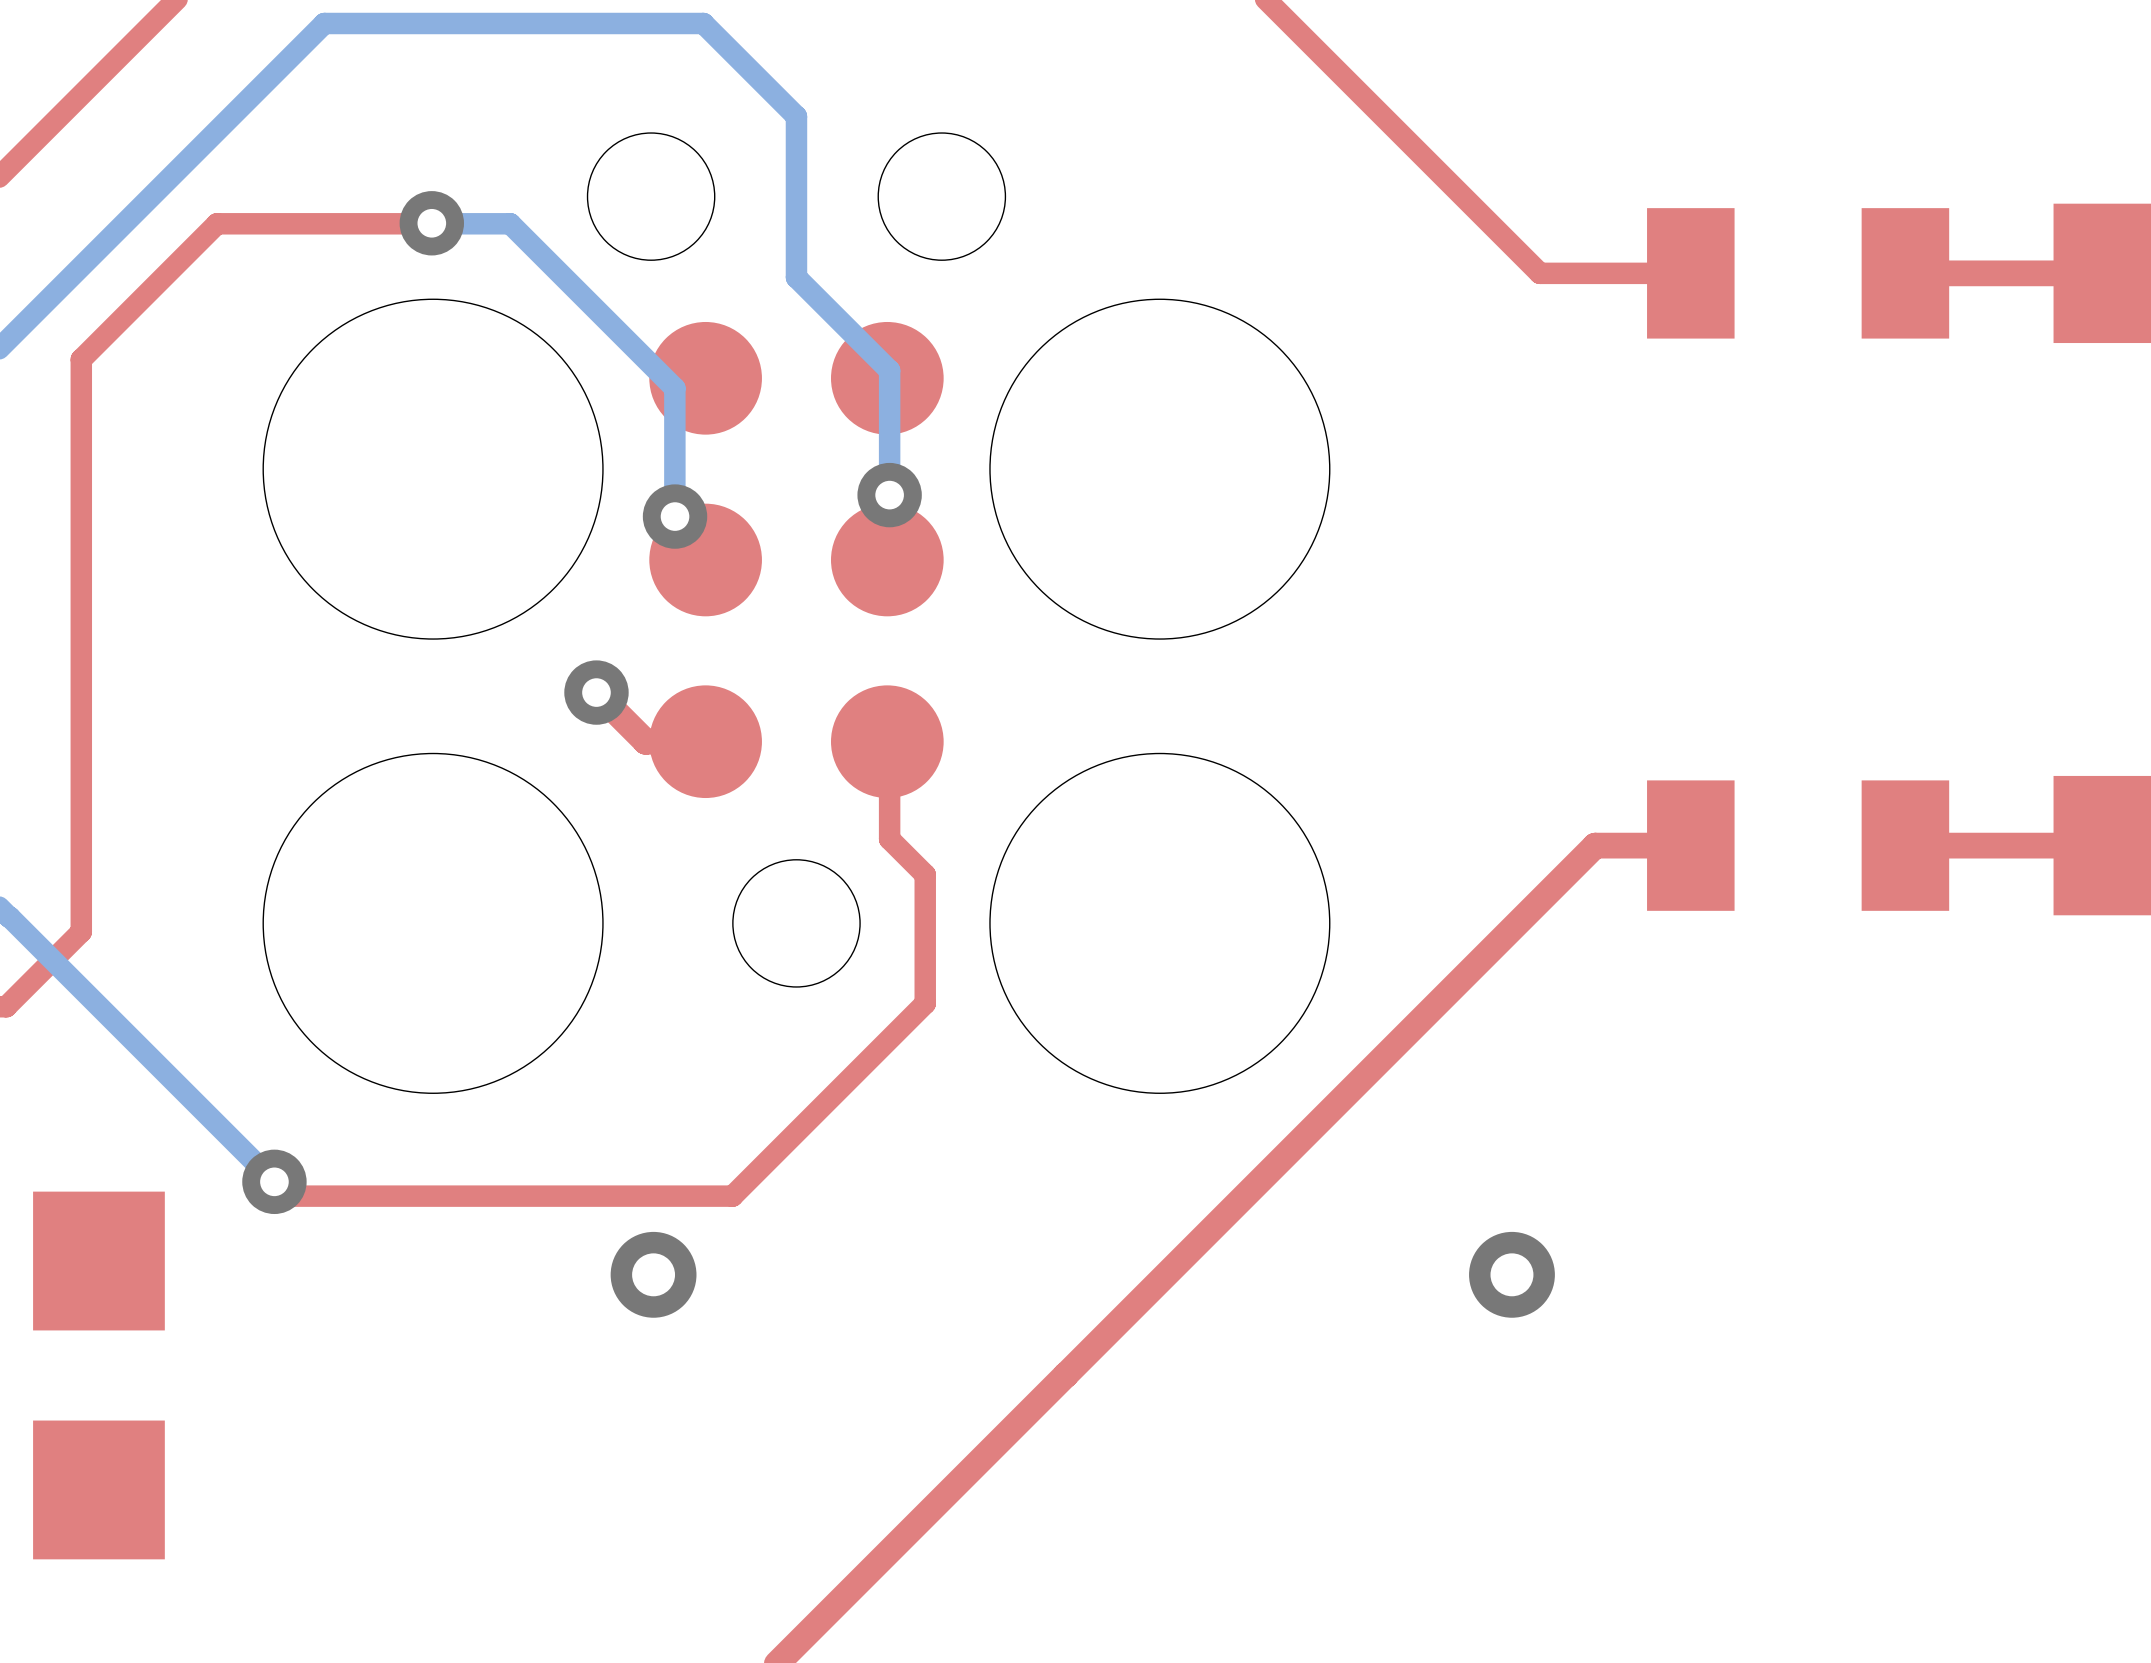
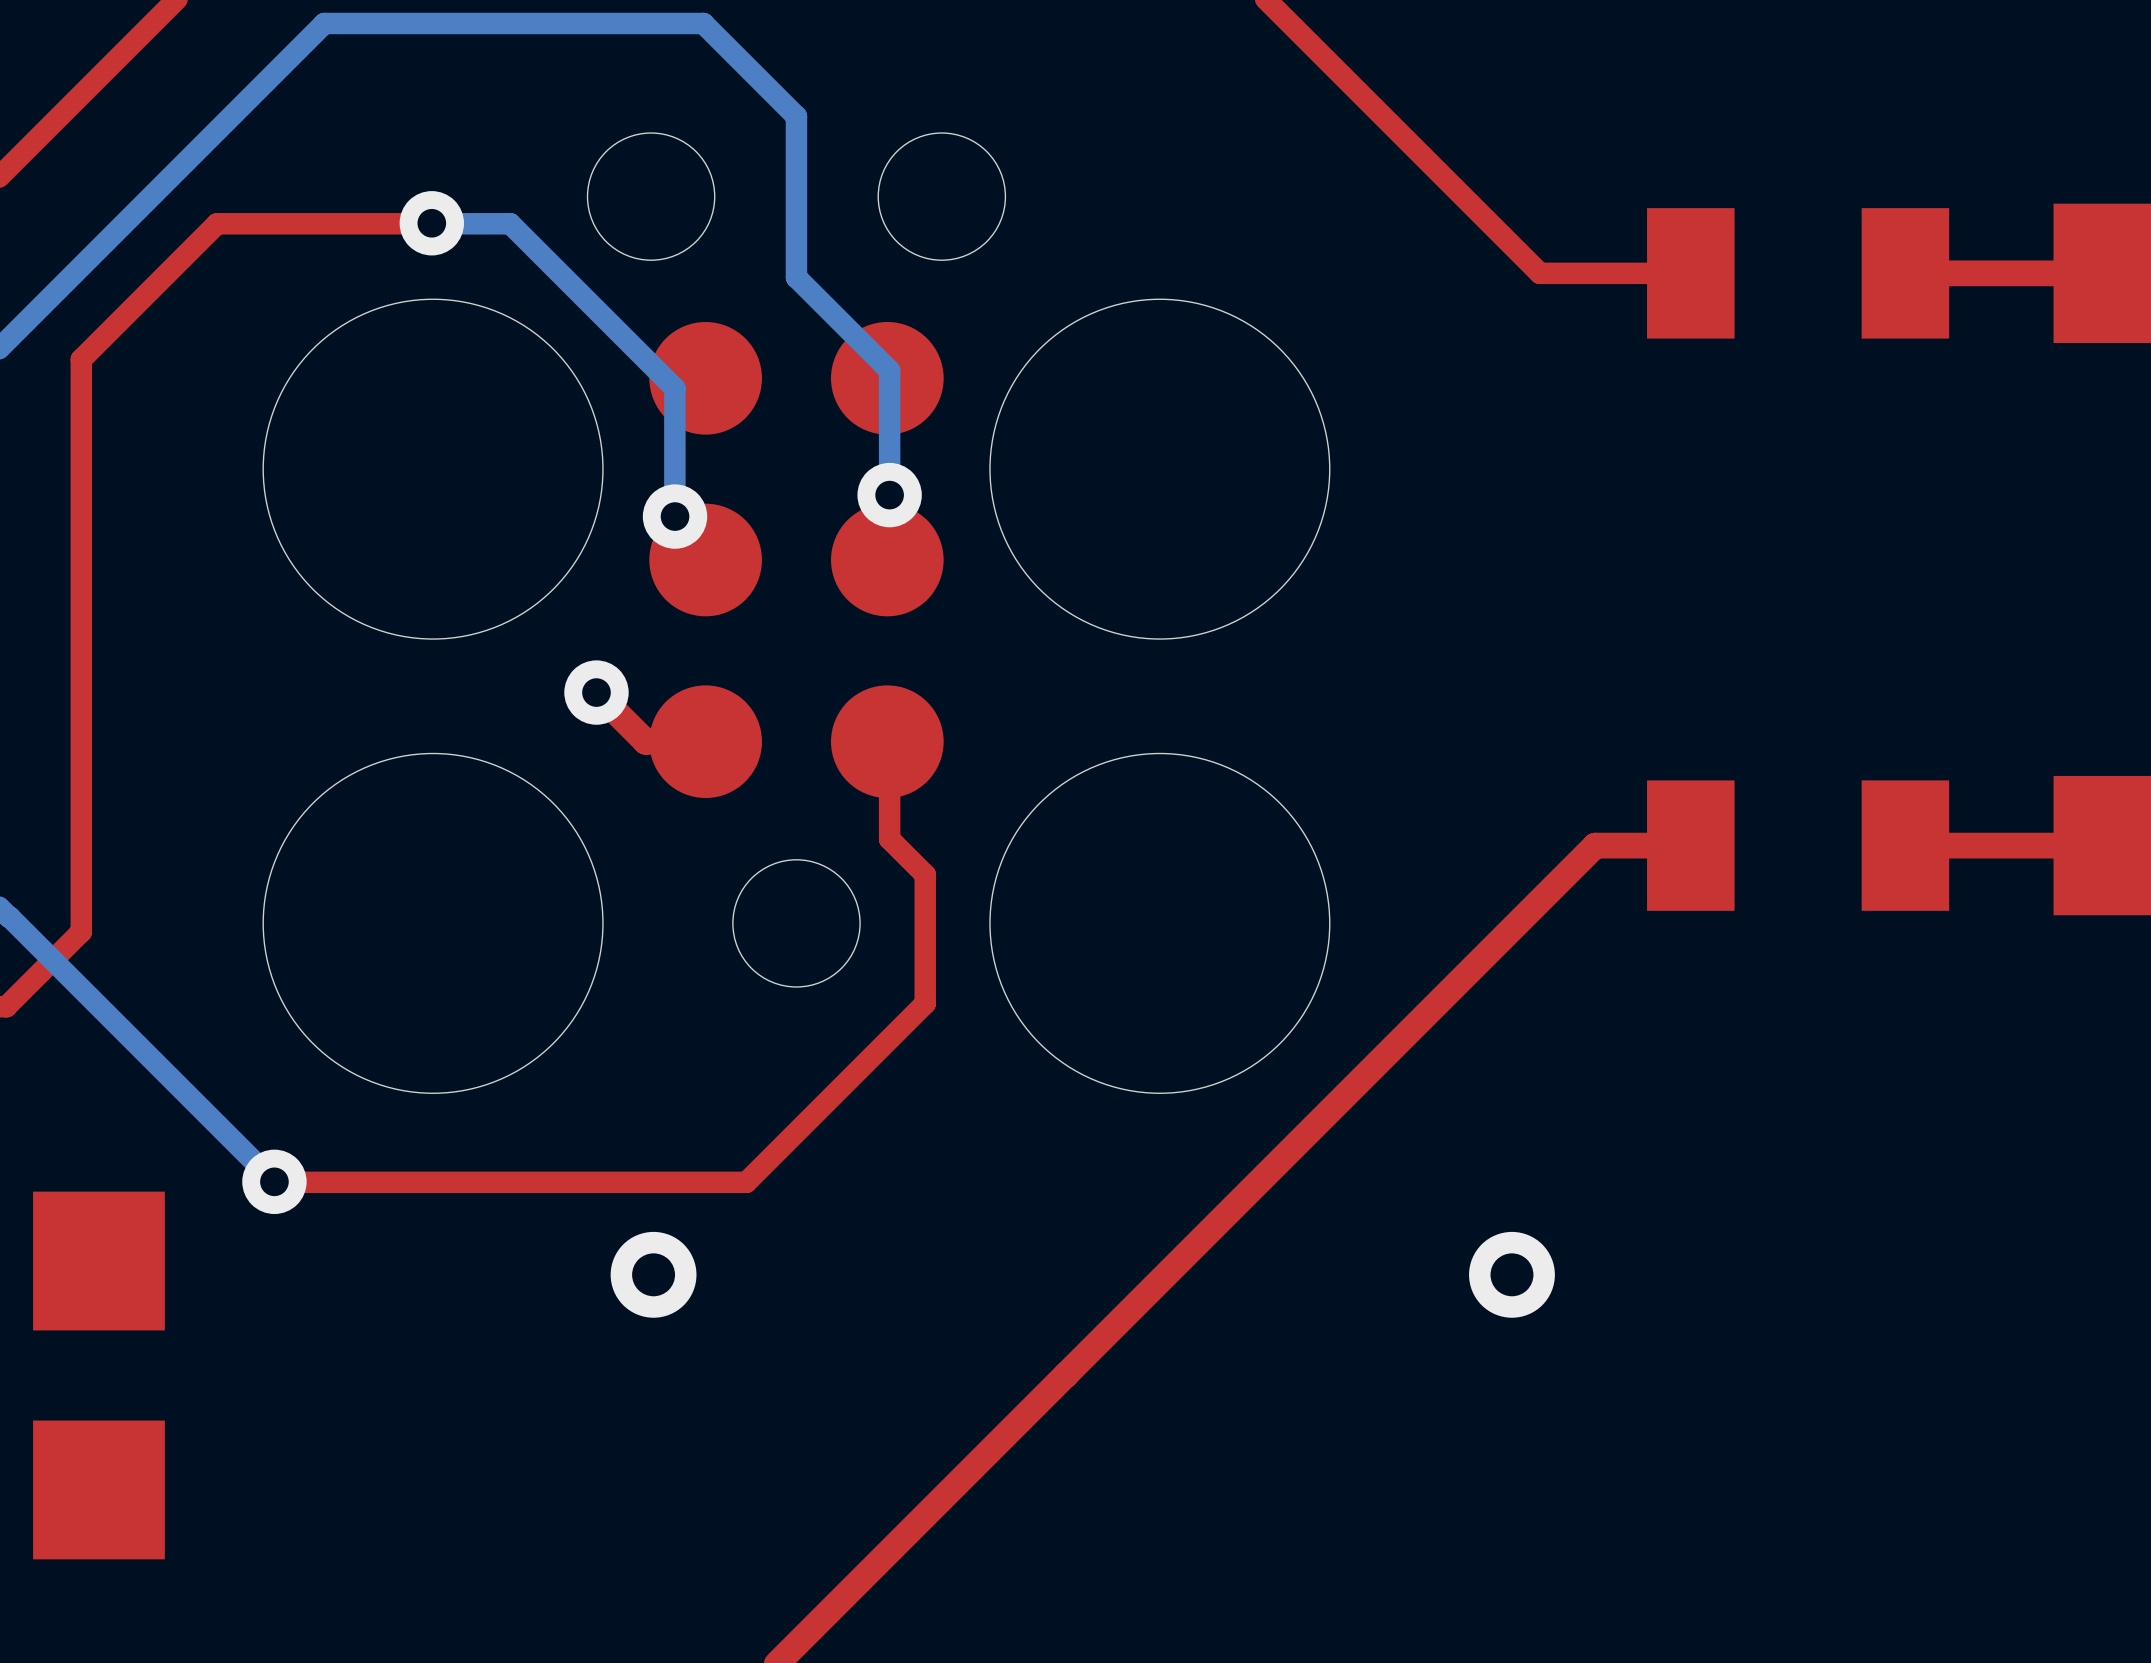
top track: (746, 1182) (732, 1196) (288, 1196) (274, 1182) -> (746, 1182) (274, 1182)

